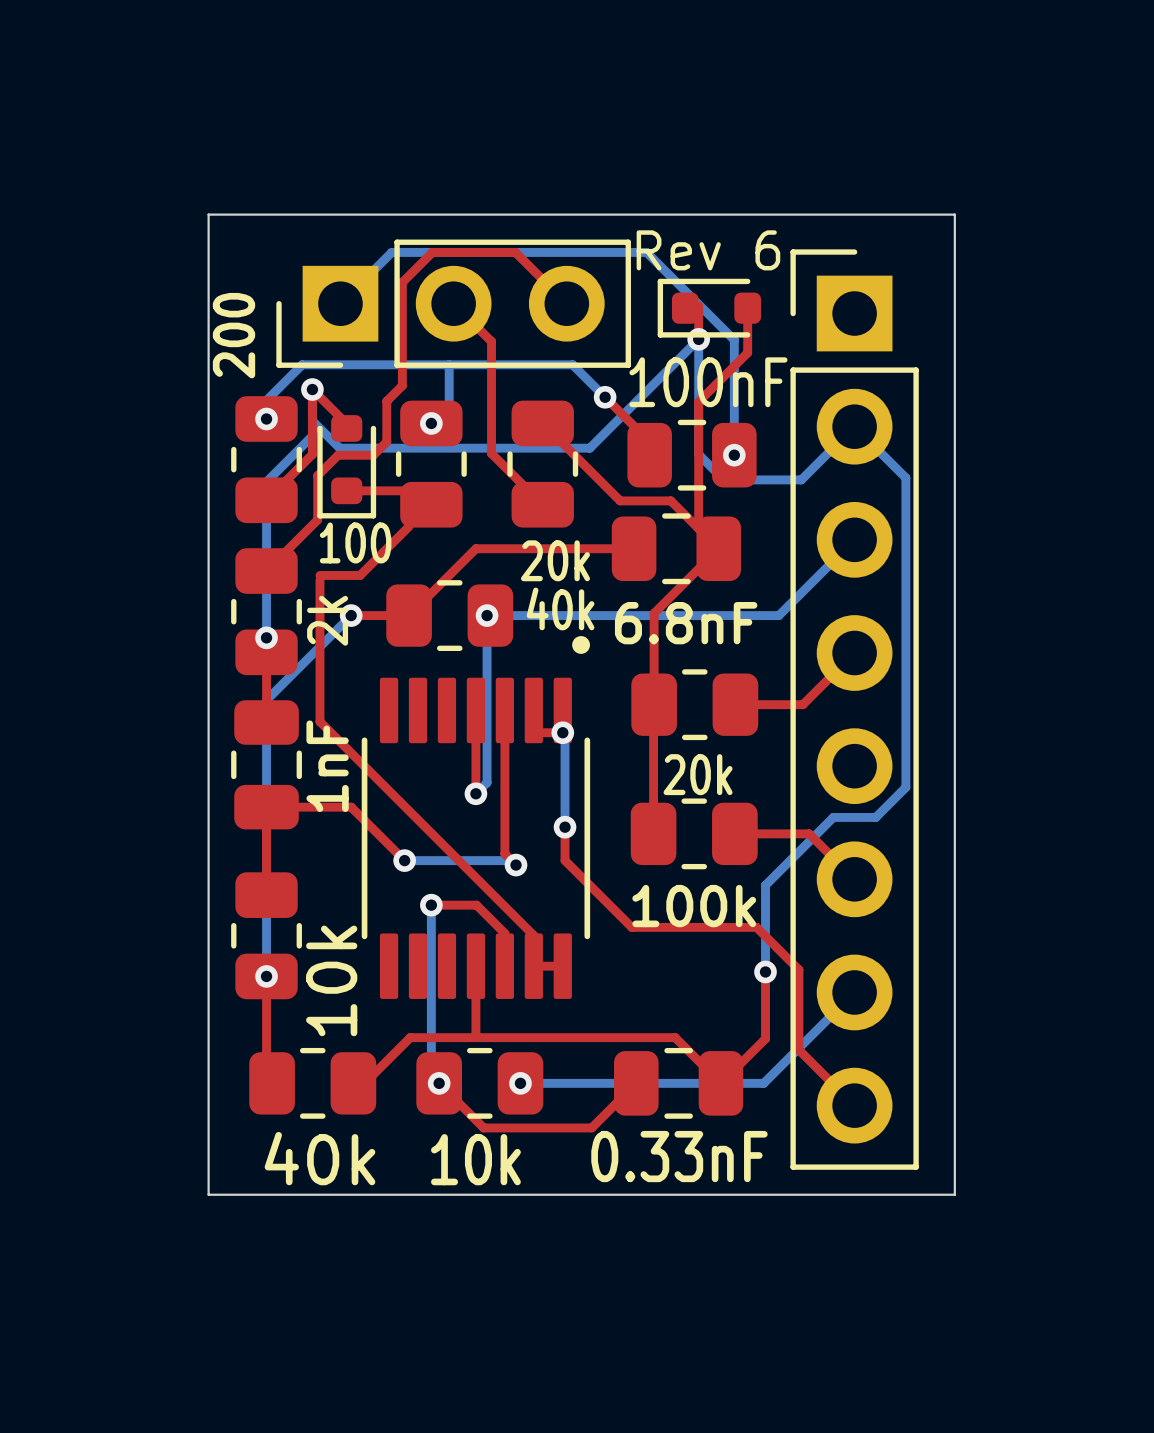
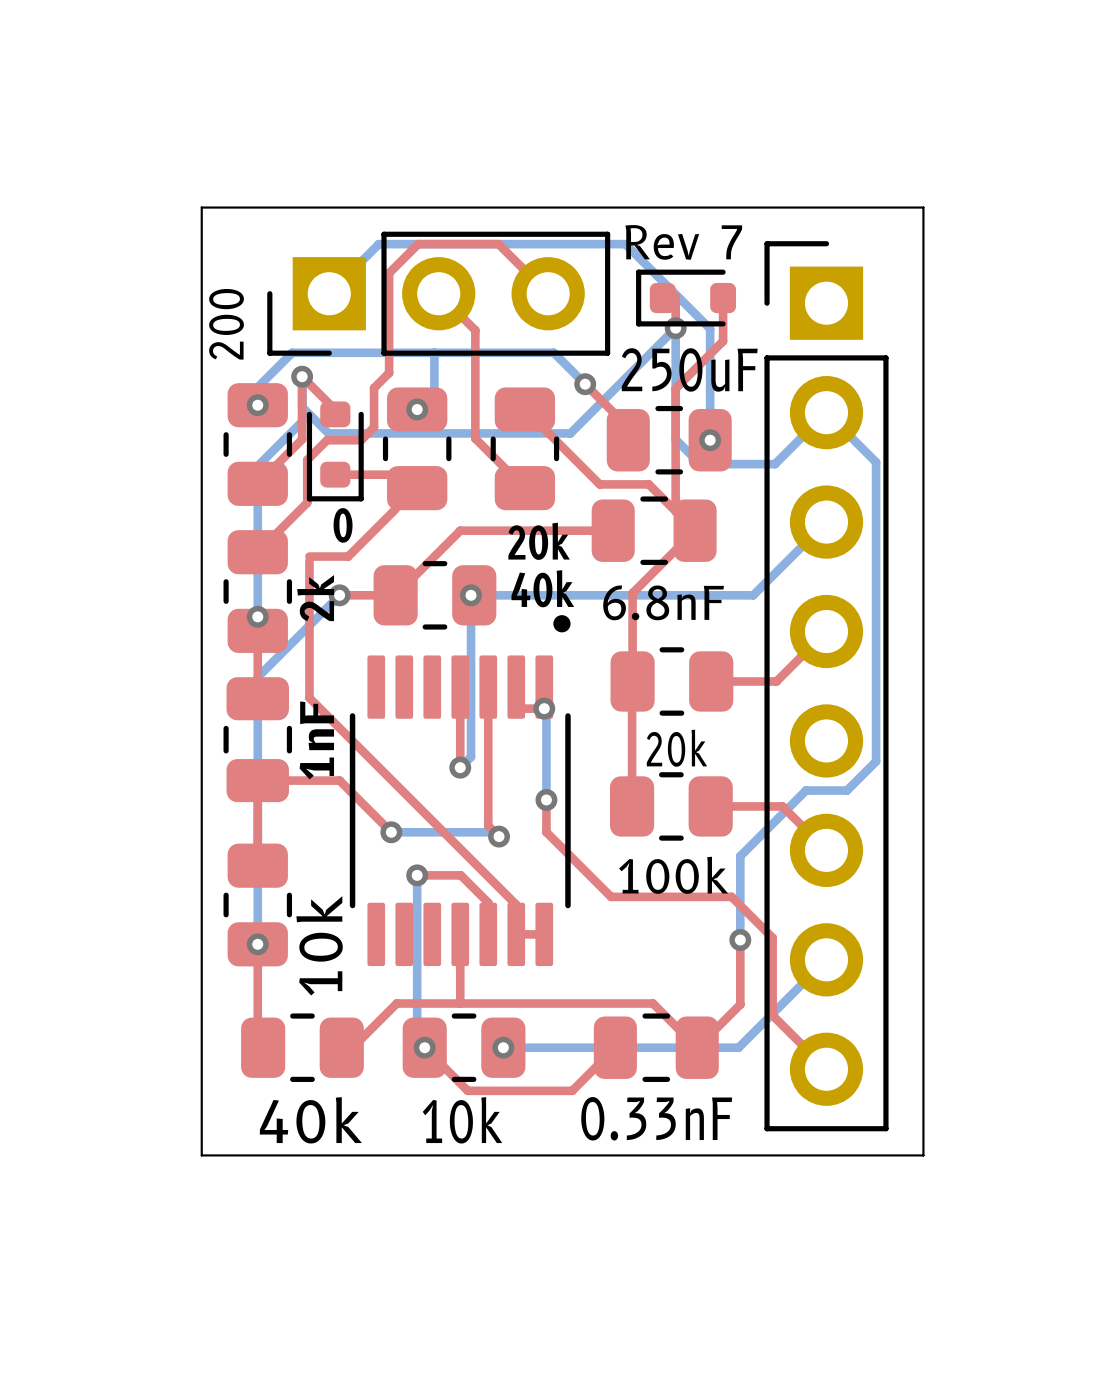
text: Rev 6 (708, 250) -> Rev 7 (683, 242)
part value: 100nF (708, 382) -> 250uF (689, 369)
part value: 100 (355, 542) -> 0 (343, 525)

